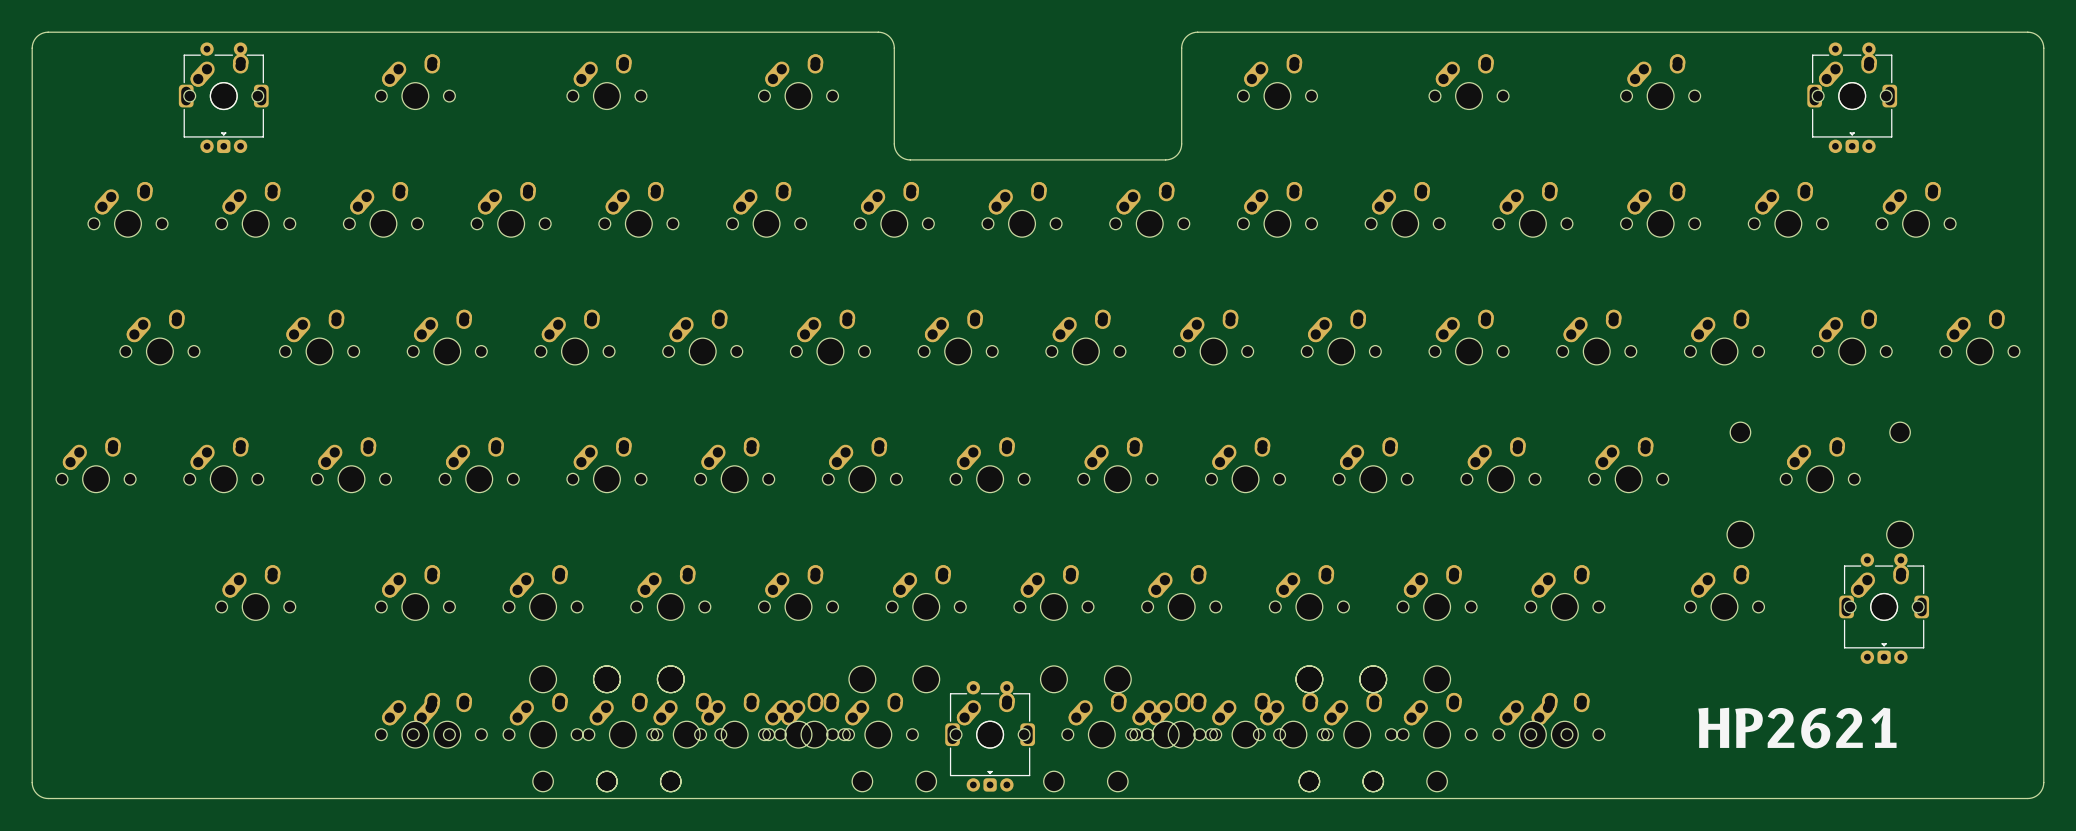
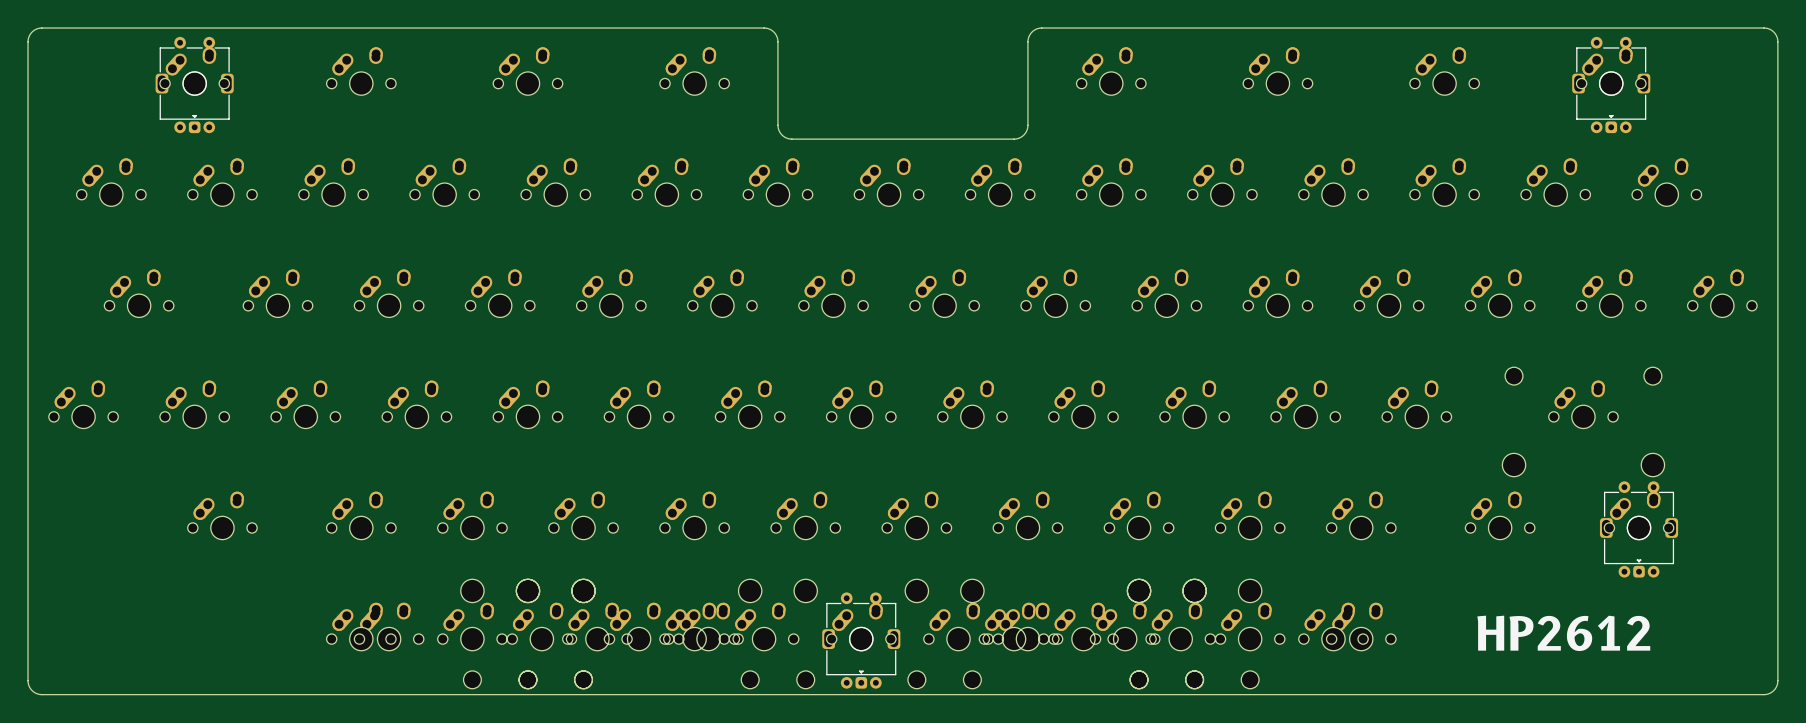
text: HP2621 (1797, 728) -> HP2612 (1563, 633)

